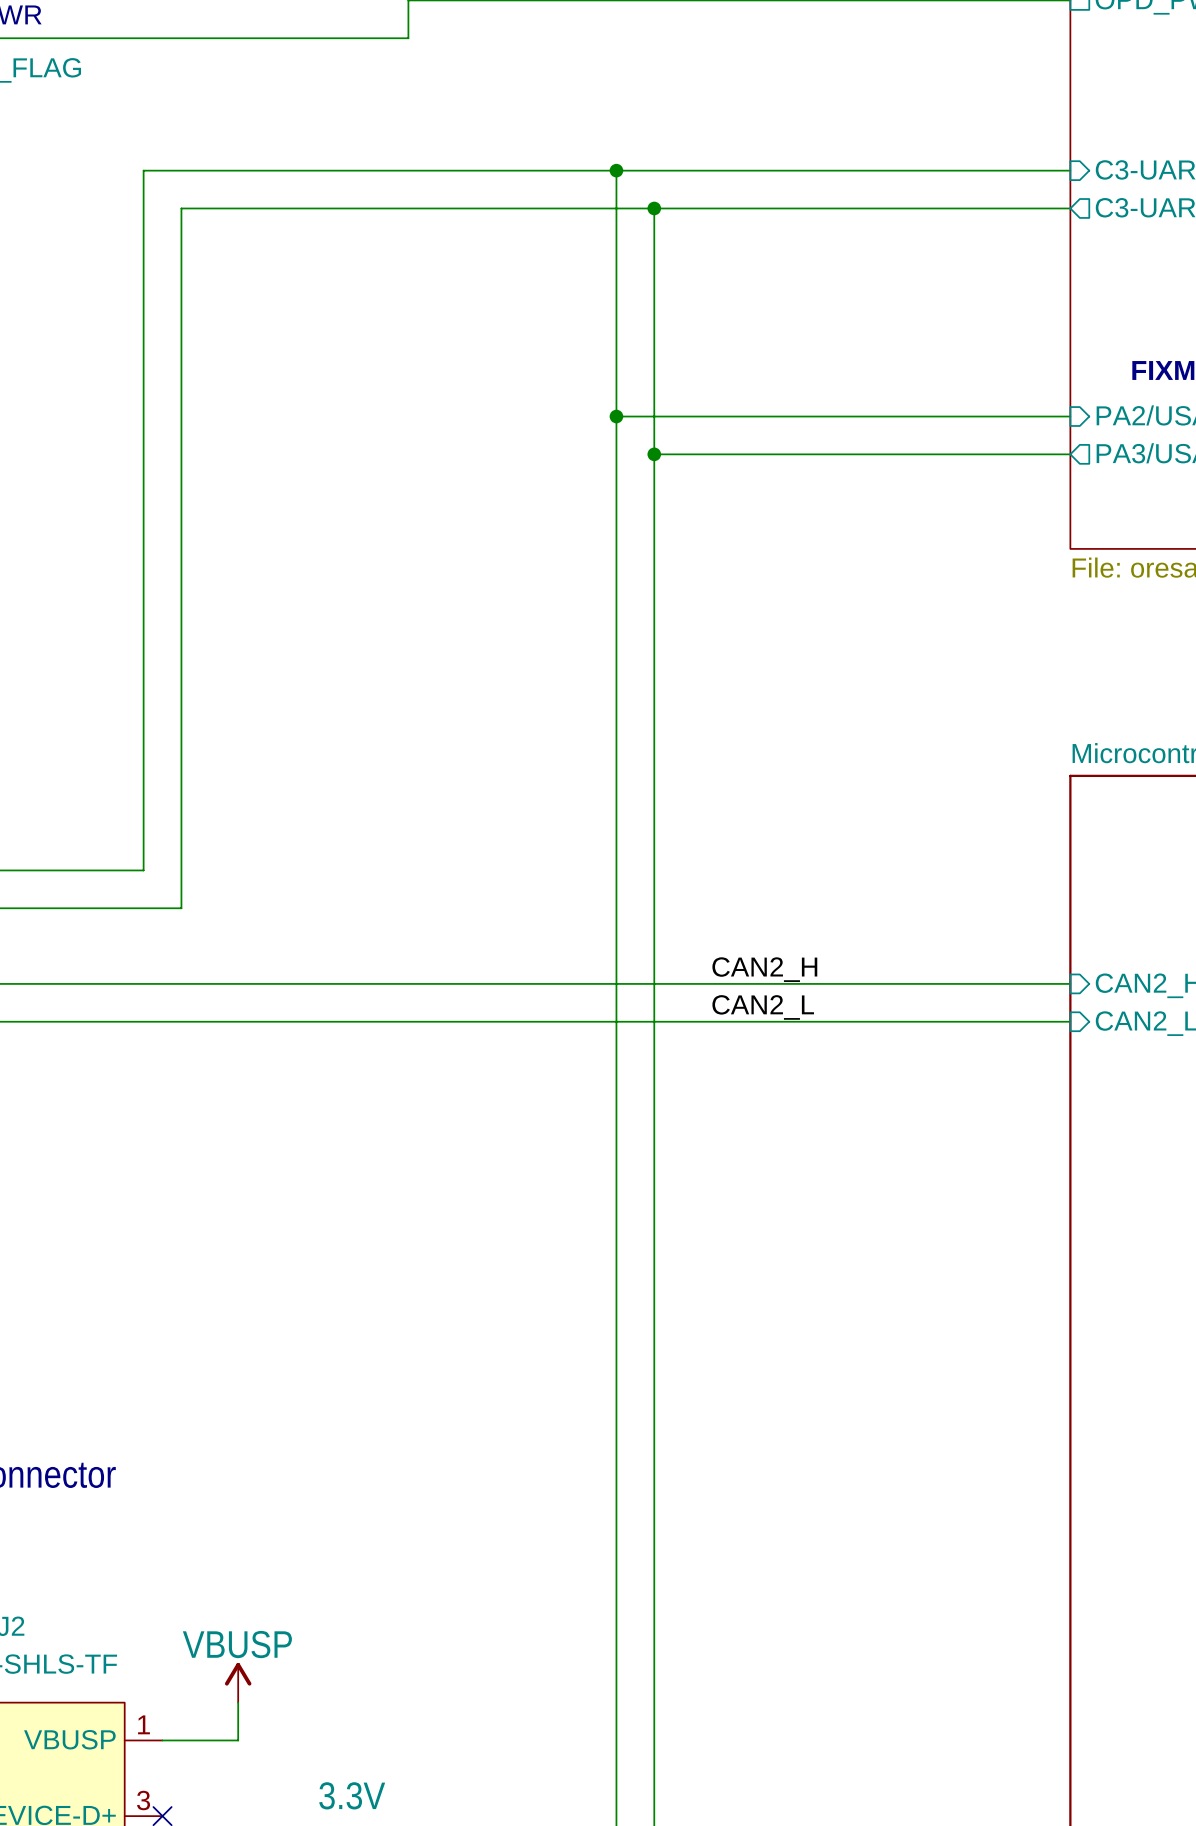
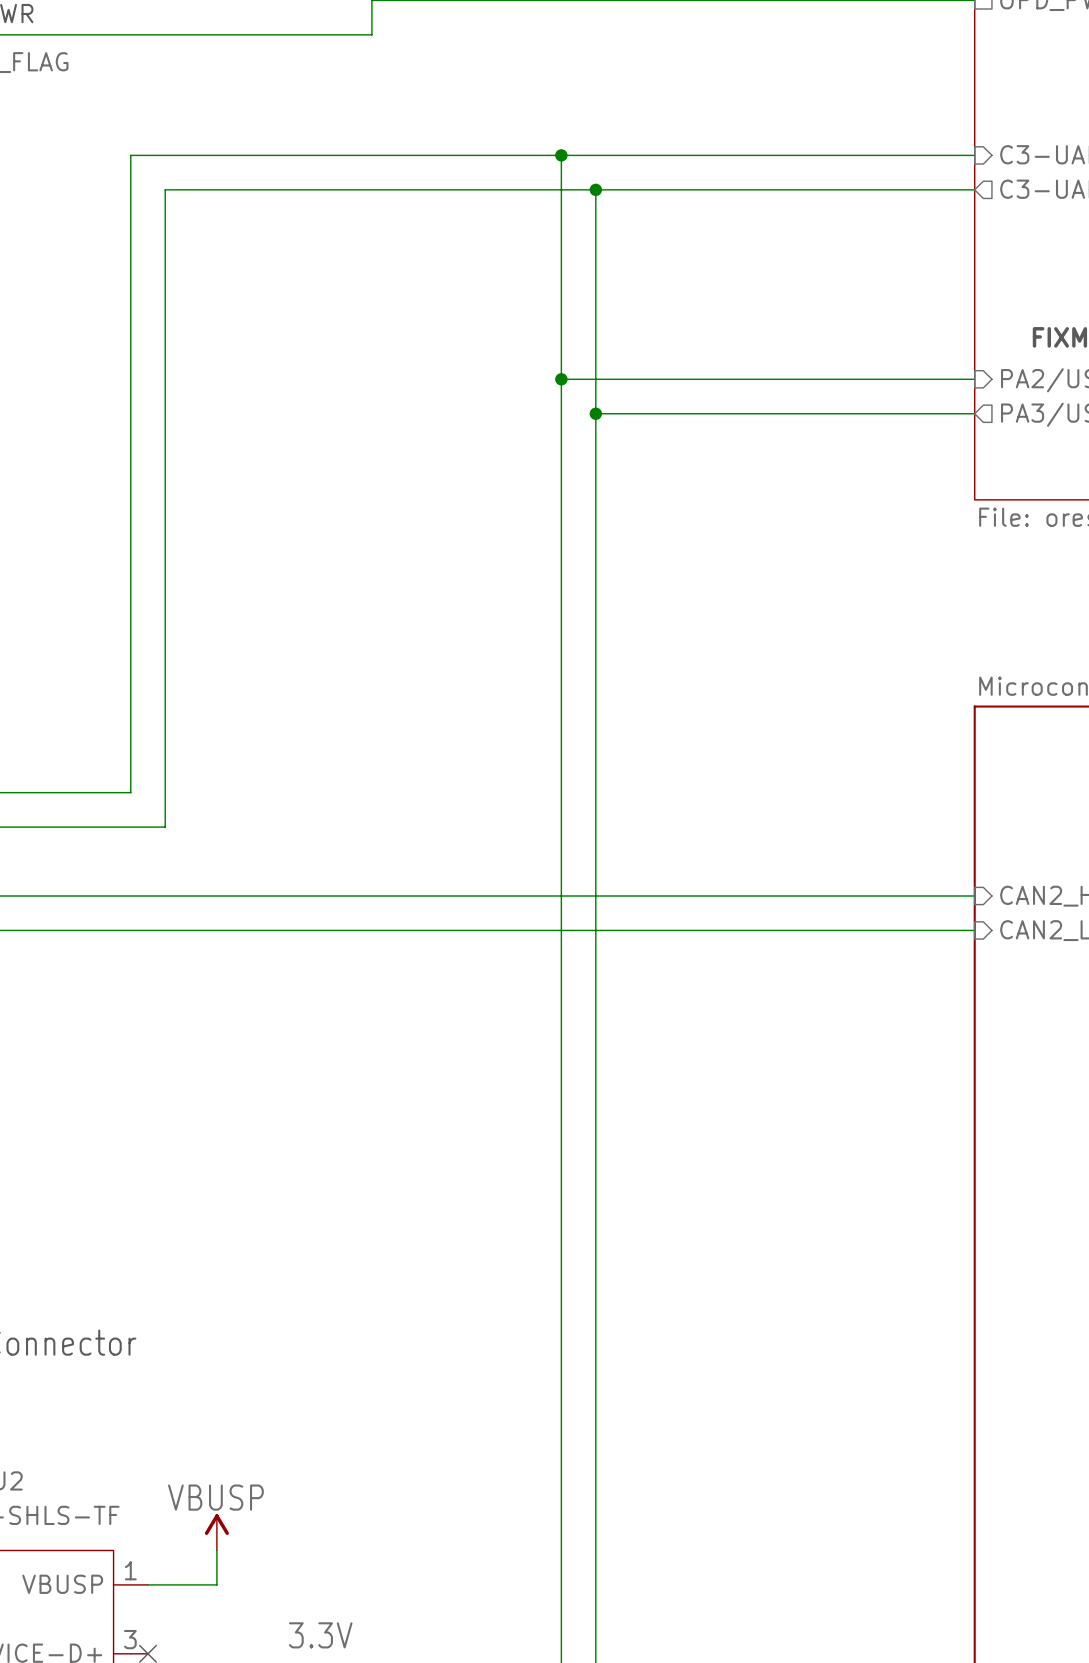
label: CAN2_H (764, 969) -> none
label: CAN2_L (763, 1007) -> none

